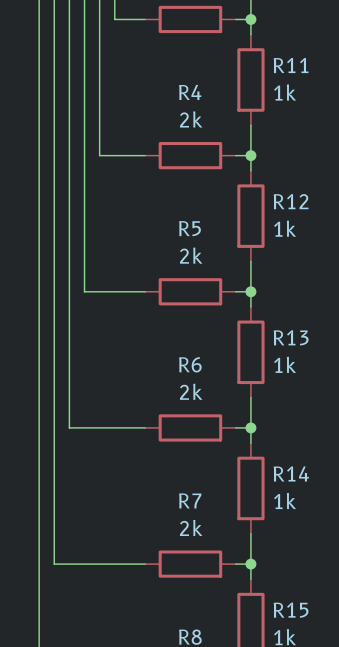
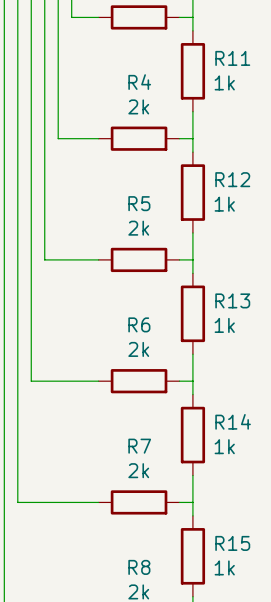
junction: (250, 19) -> none
junction: (250, 155) -> none
junction: (250, 291) -> none
junction: (250, 427) -> none
junction: (250, 564) -> none

